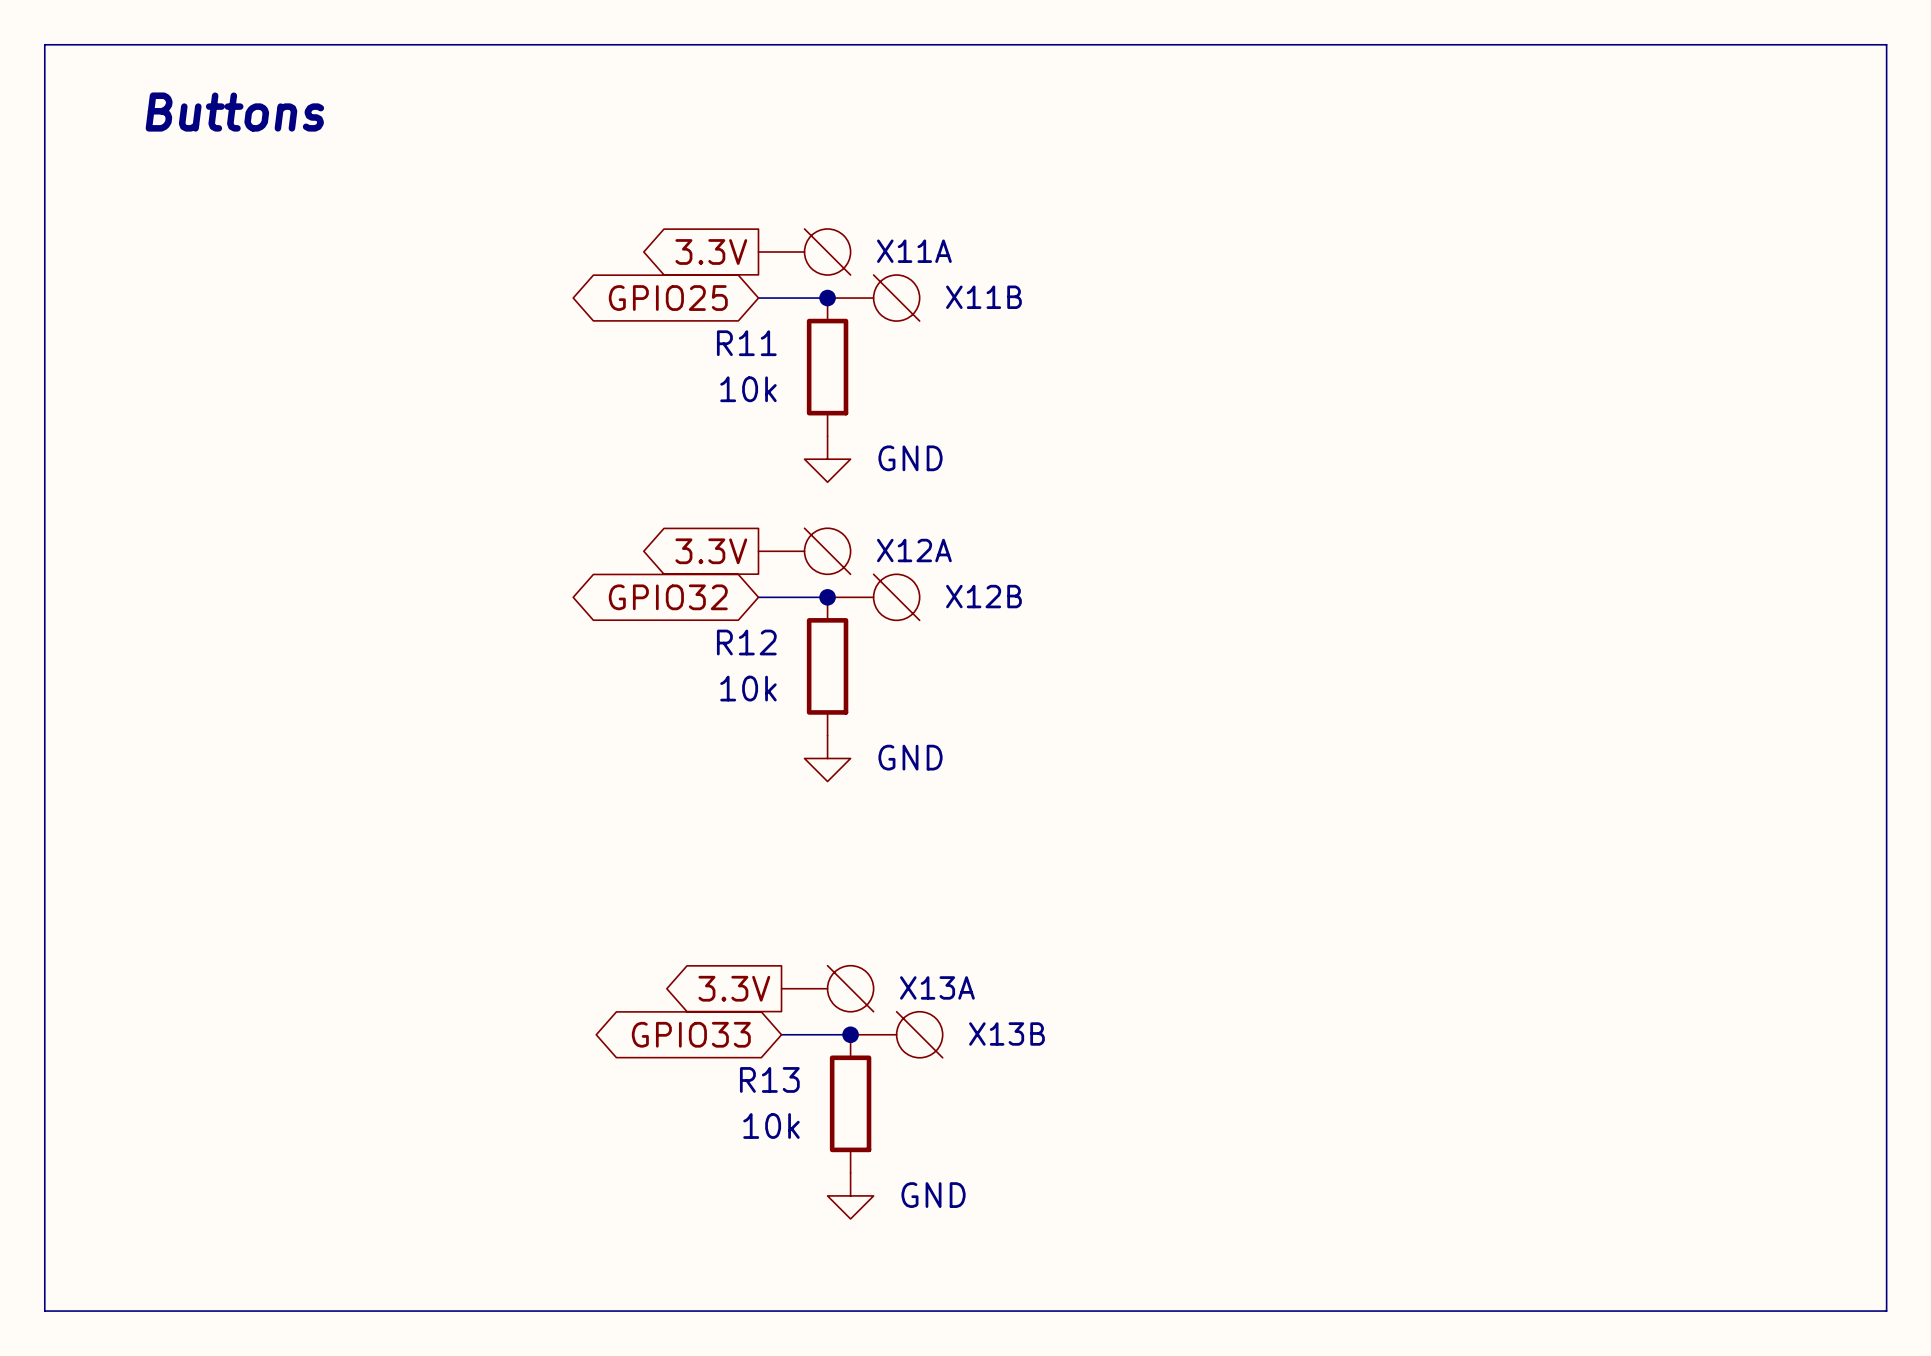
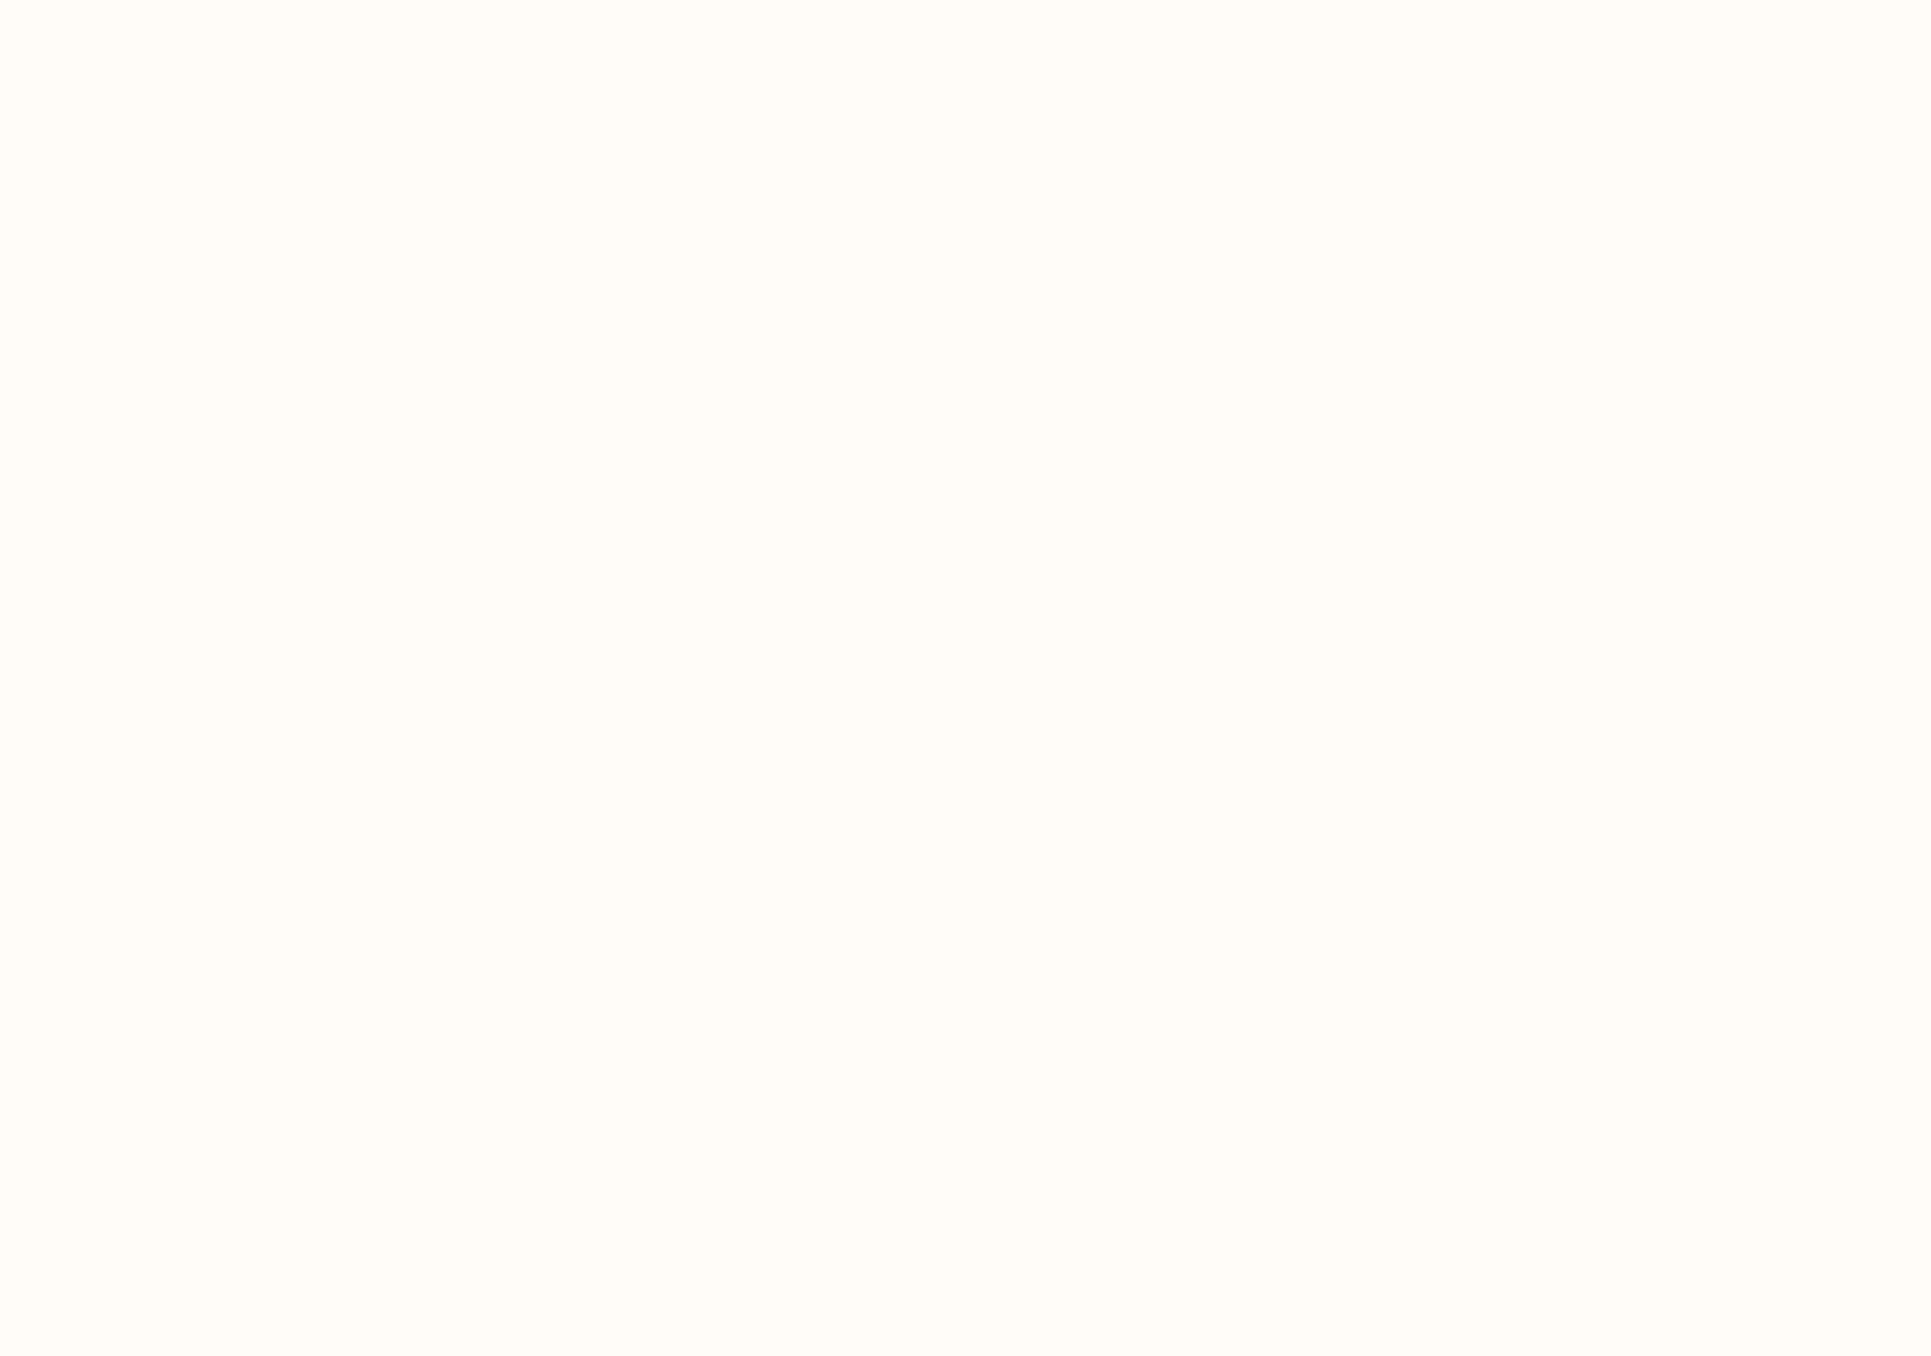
line: (44, 44) (44, 1311) (1886, 1311) (1886, 44) (44, 44) -> none
text: Buttons (234, 112) -> none
global label: 3.3V (711, 251) -> none
X11A: (804, 251) -> none
global label: GPIO25 (668, 298) -> none
wire: (758, 298) (827, 298) -> none
junction: (827, 298) -> none
X11B: (873, 298) -> none
R11: 10k (827, 367) -> none
power symbol: GND (827, 459) -> none
global label: 3.3V (711, 551) -> none
X12A: (804, 551) -> none
global label: GPIO32 (668, 597) -> none
wire: (758, 597) (827, 597) -> none
junction: (827, 597) -> none
X12B: (873, 597) -> none
R12: 10k (827, 666) -> none
power symbol: GND (827, 758) -> none
global label: 3.3V (734, 988) -> none
X13A: (827, 988) -> none
global label: GPIO33 (691, 1034) -> none
wire: (781, 1034) (850, 1034) -> none
junction: (850, 1034) -> none
X13B: (896, 1034) -> none
R13: 10k (850, 1103) -> none
power symbol: GND (850, 1195) -> none

